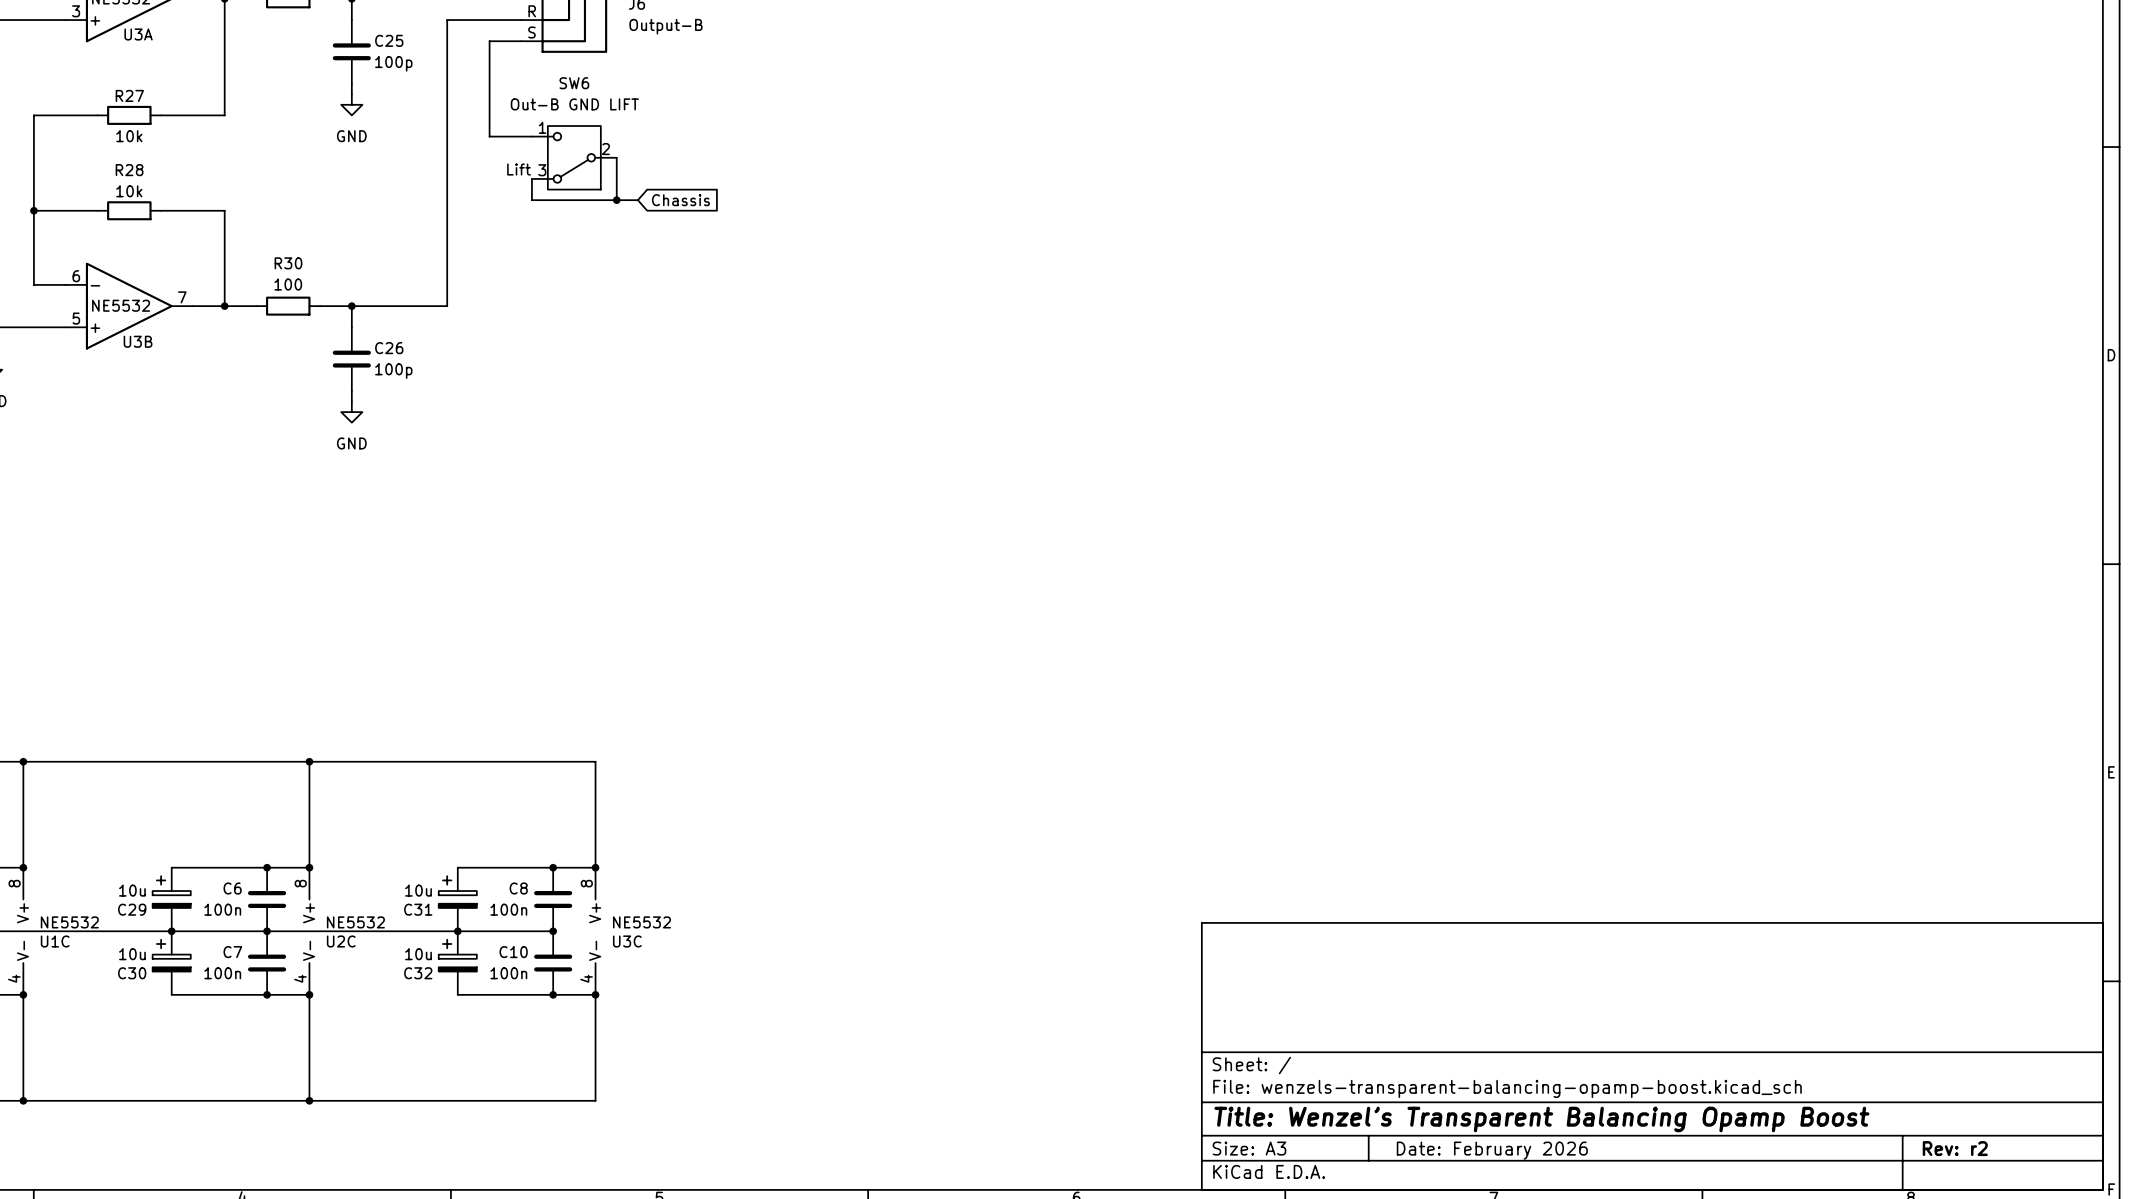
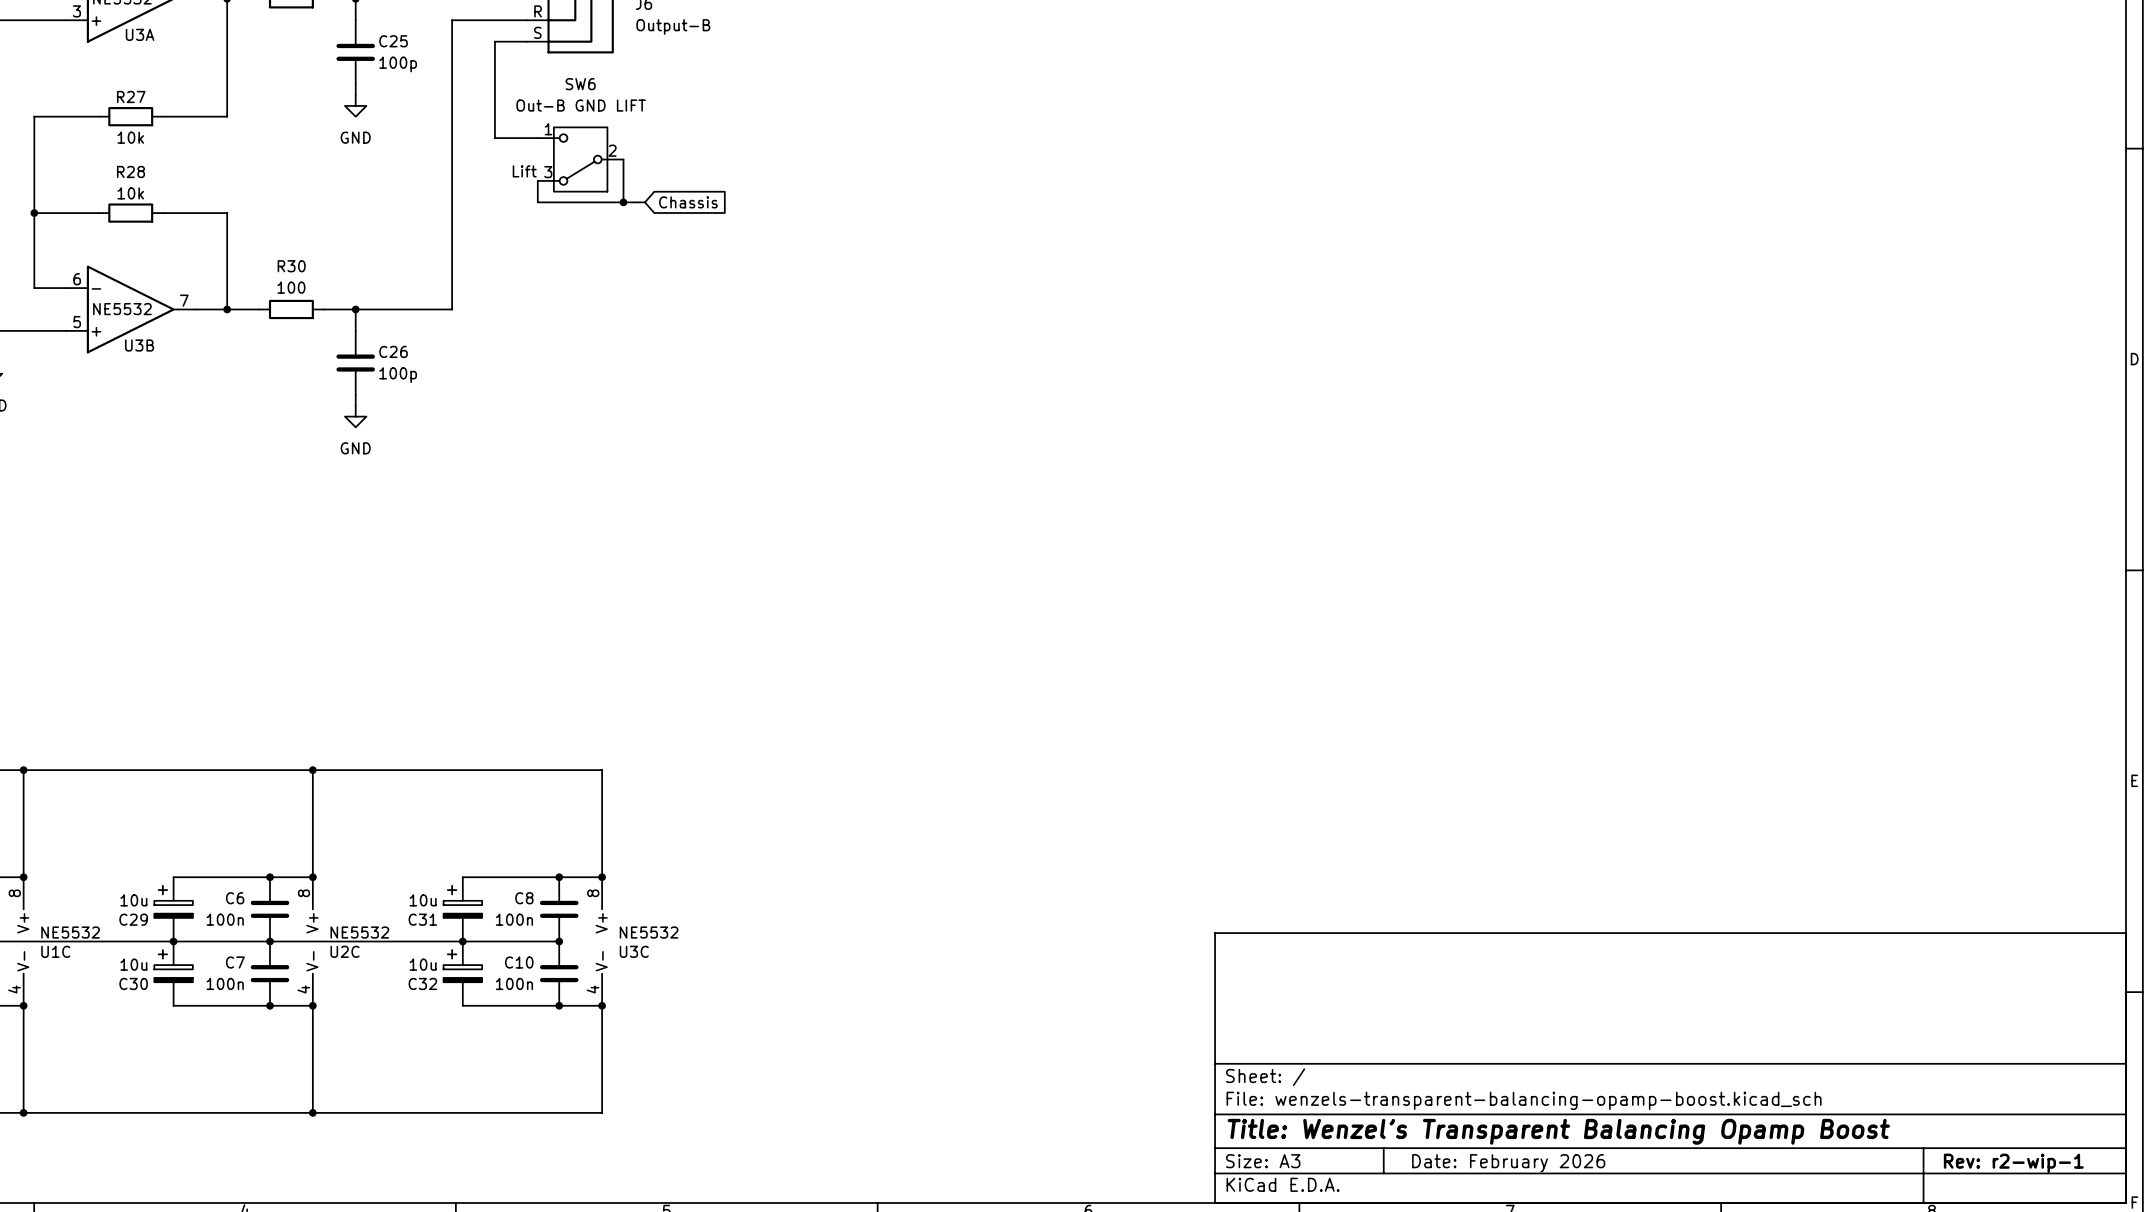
title block: Rev: r2 (1955, 1148) -> Rev: r2-wip-1 (2013, 1163)

